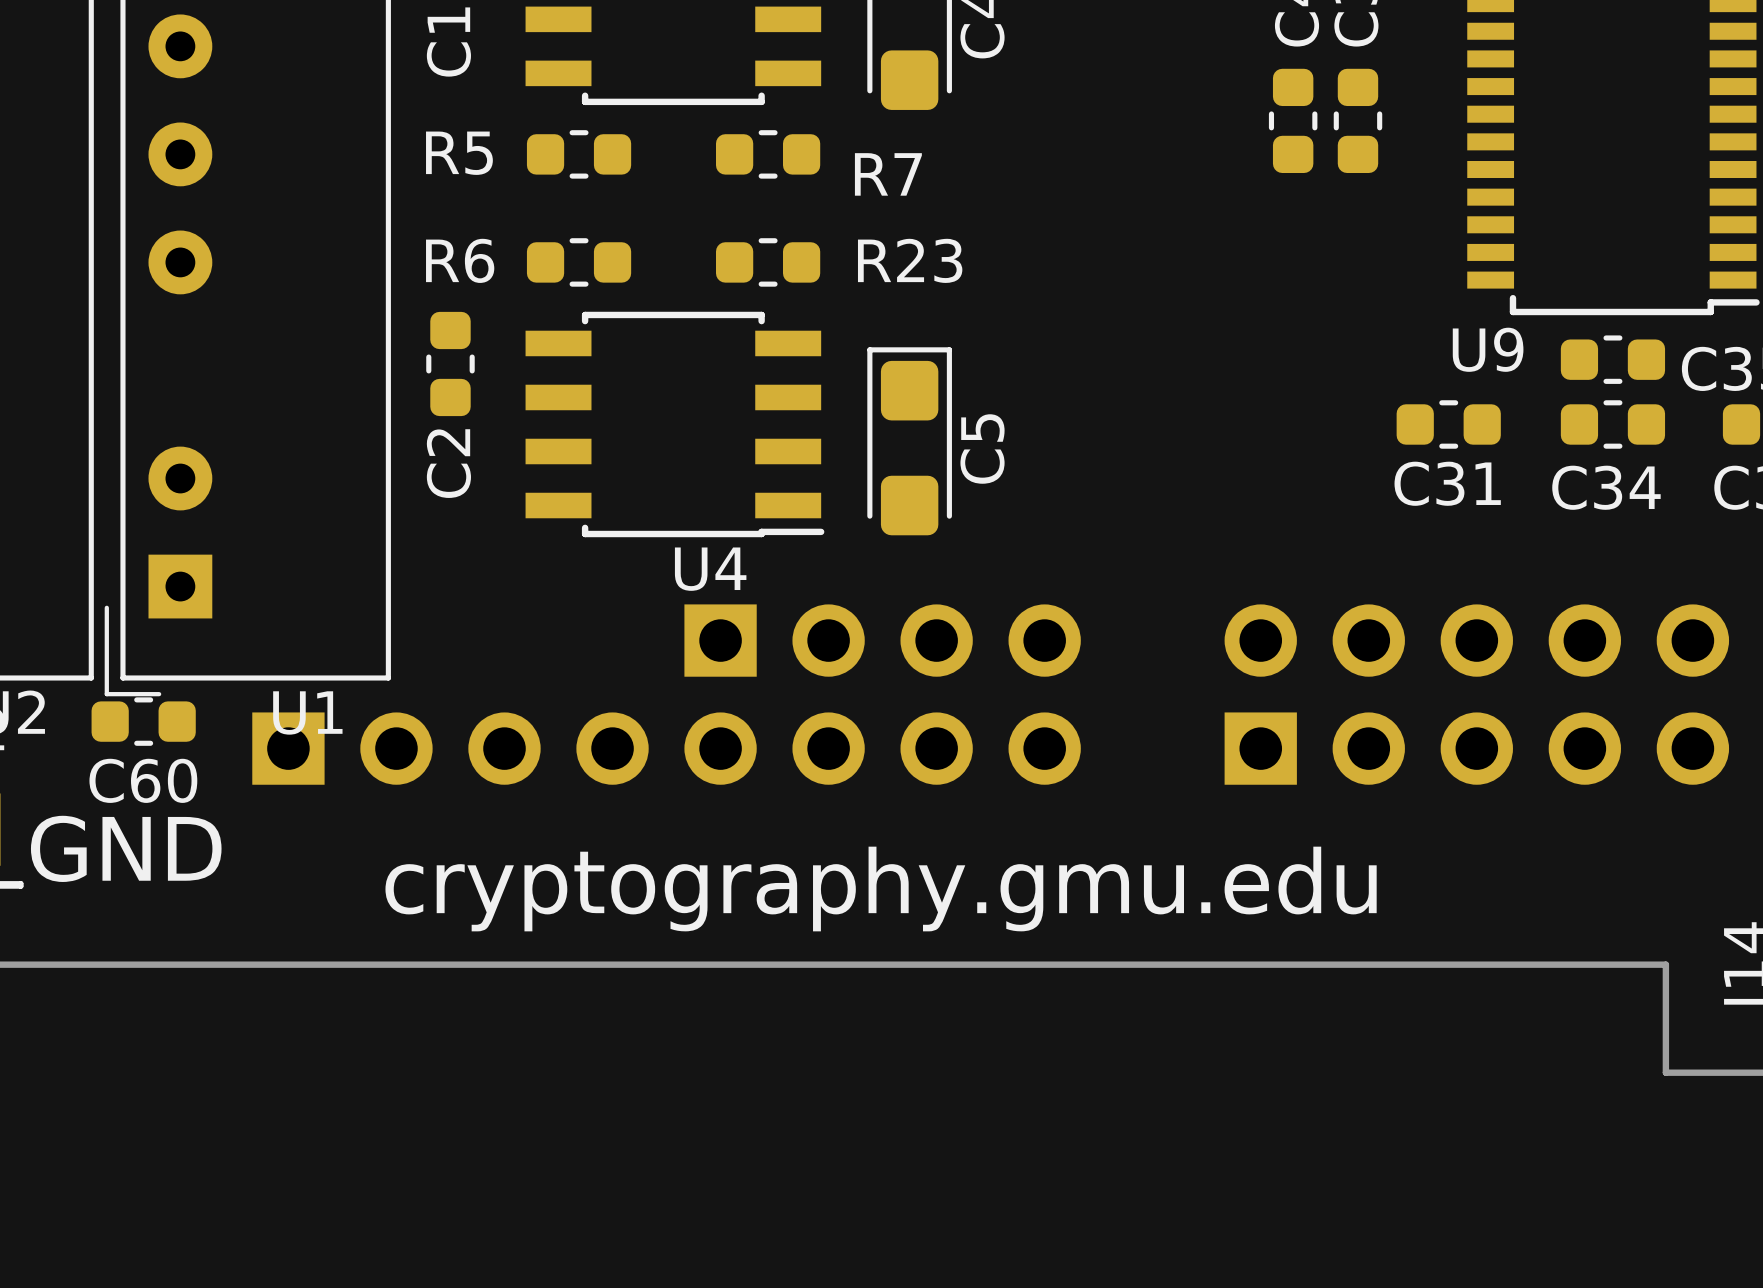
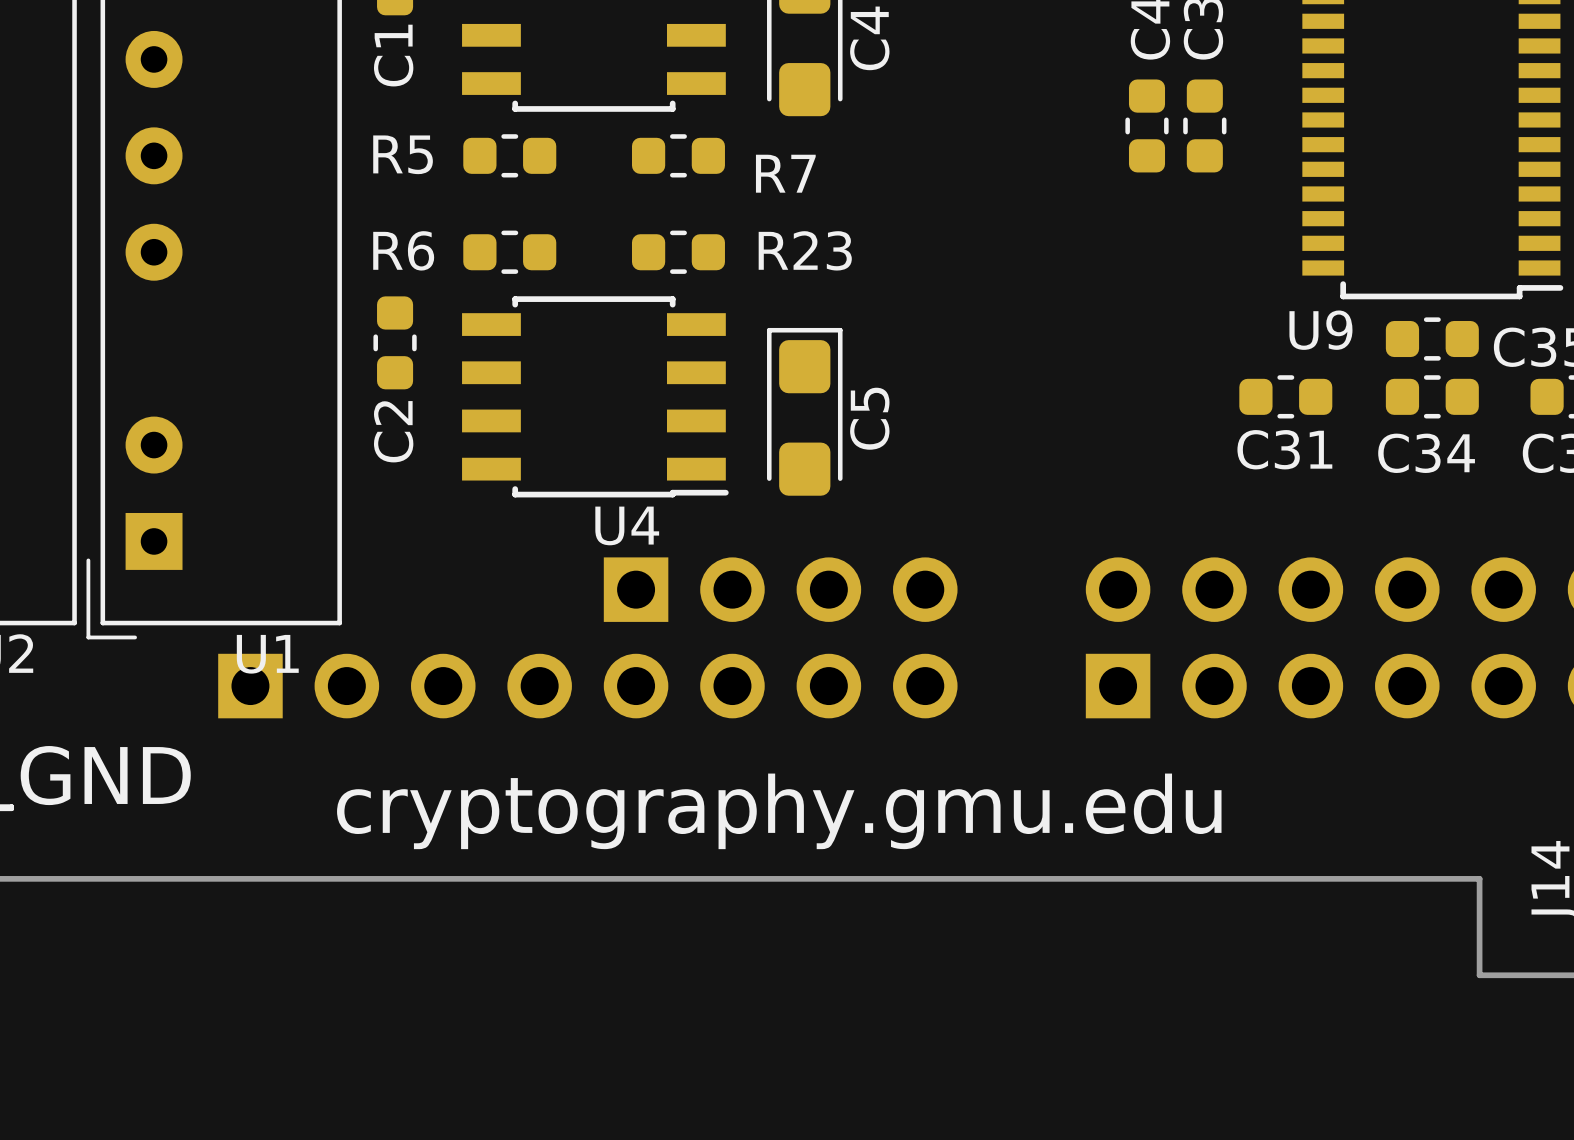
C60: (143, 721) -> none

